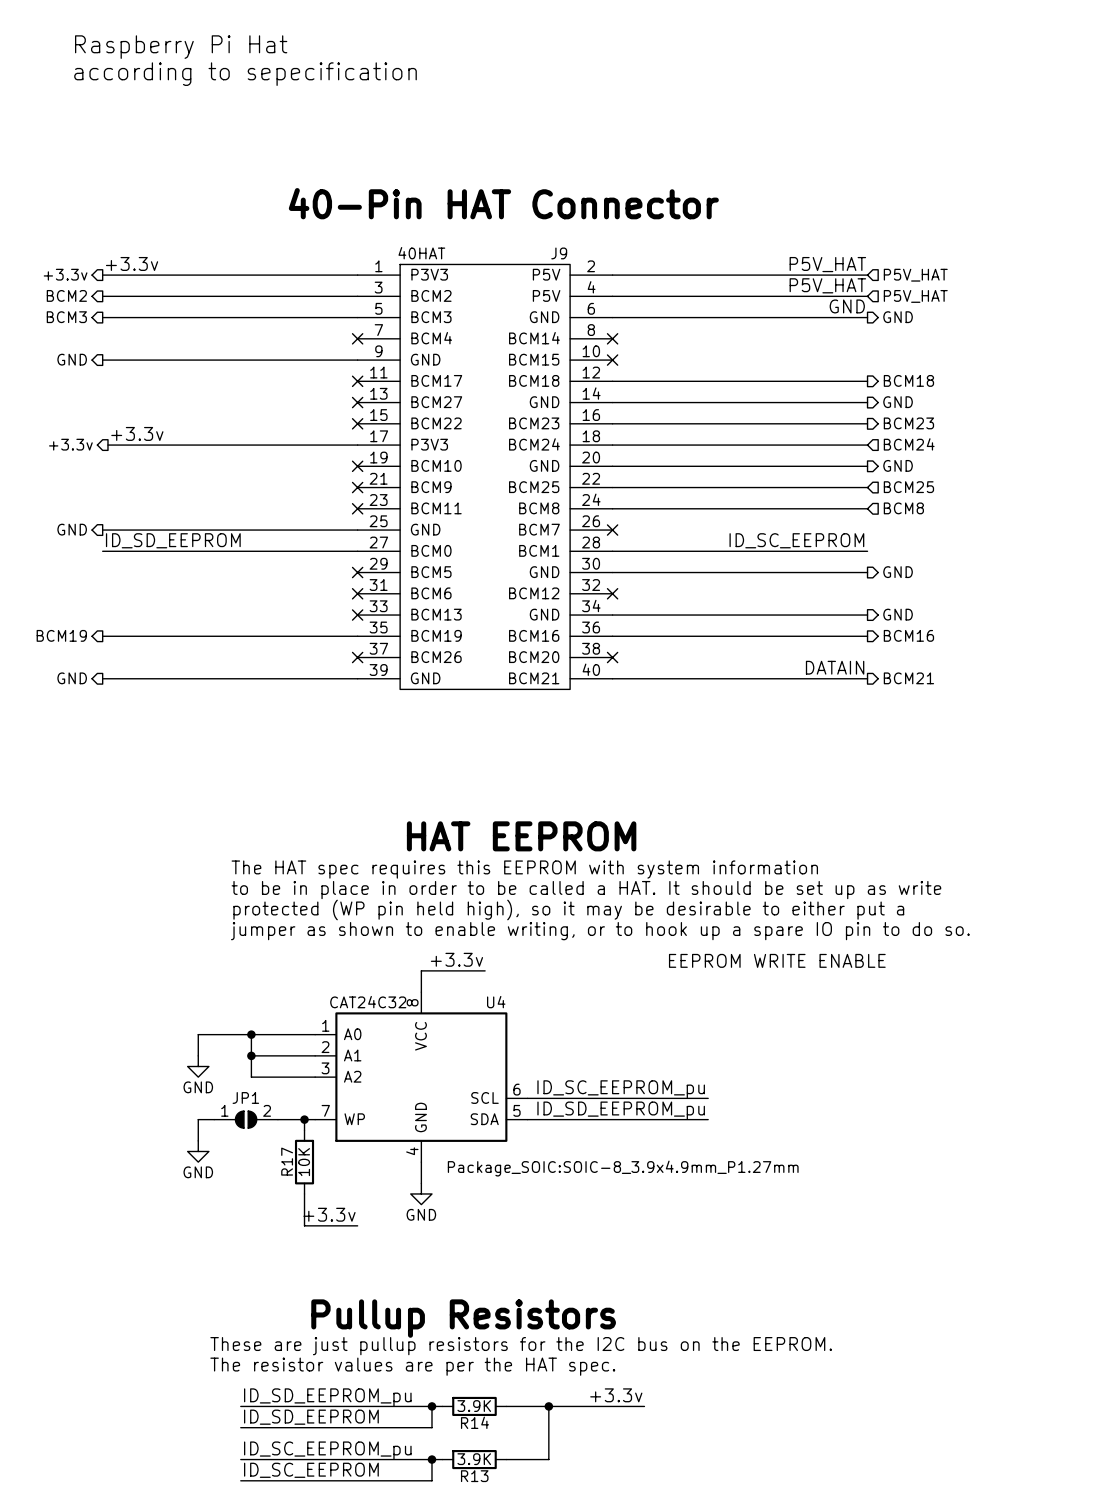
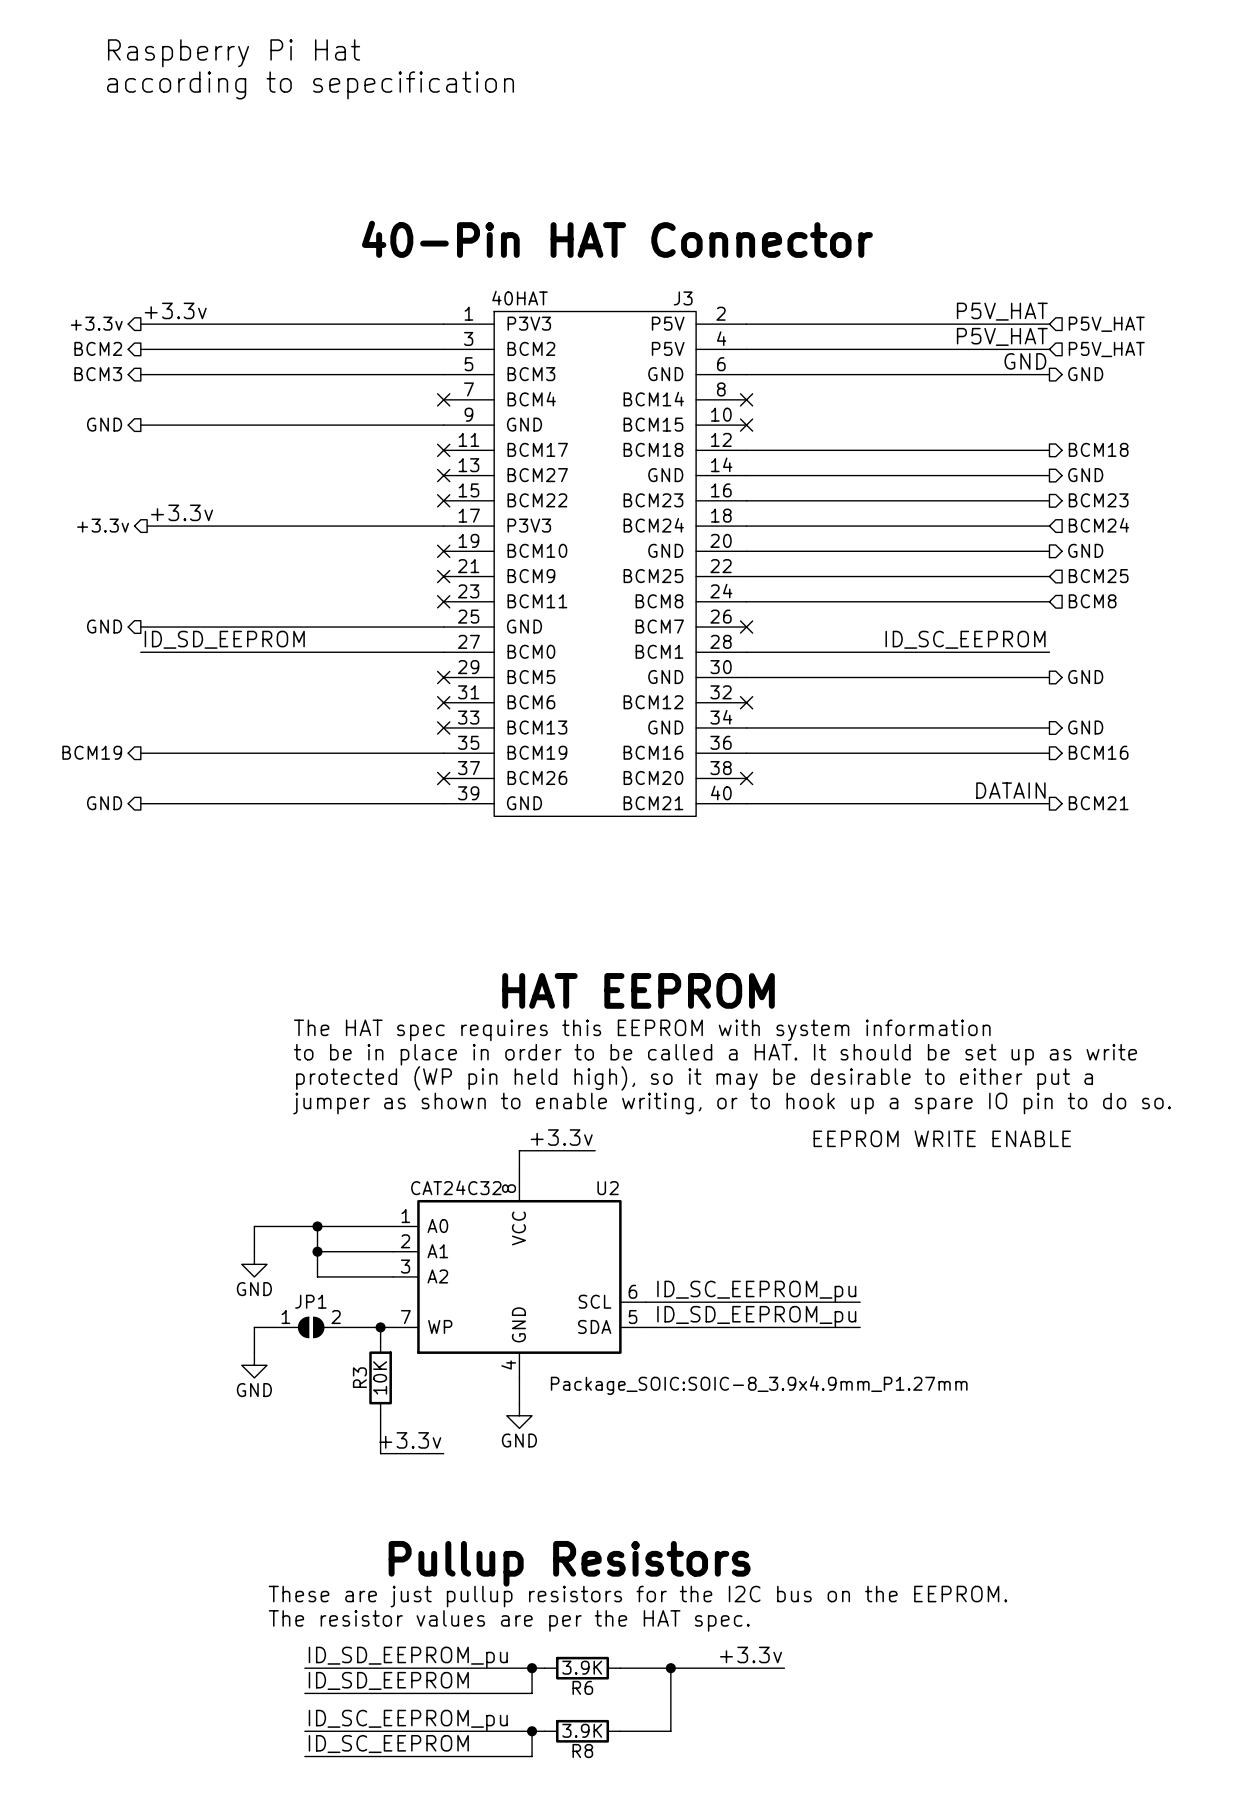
J9 name: J9 (559, 253) -> J3 (683, 298)
U4 name: U4 (496, 1002) -> U2 (608, 1188)
R17 name: R17 (287, 1161) -> R3 (359, 1377)
R14 name: R14 (474, 1422) -> R6 (582, 1687)
R13 name: R13 (474, 1476) -> R8 (582, 1751)

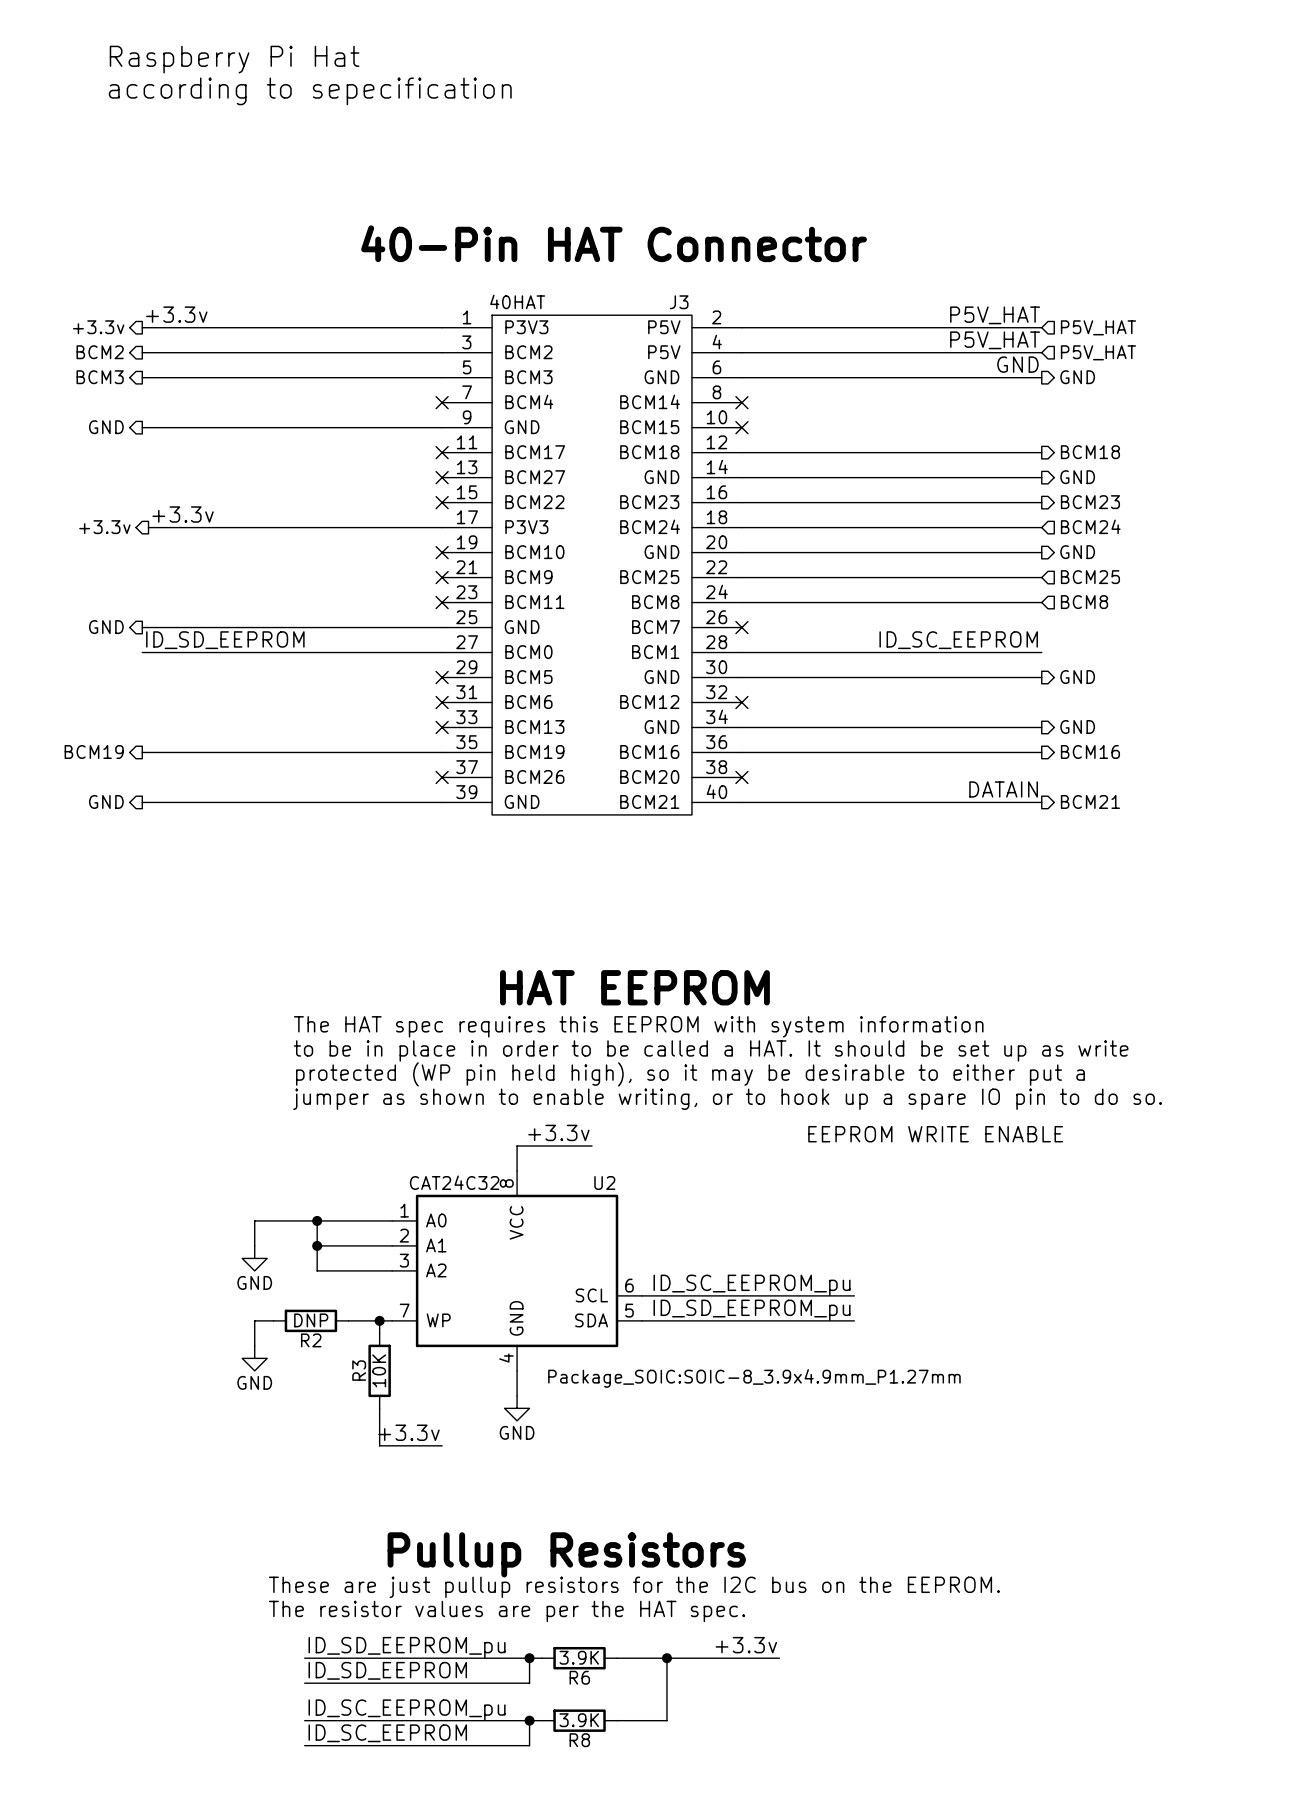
JP1: (311, 1327) -> none
R2: none -> DNP (310, 1320)

